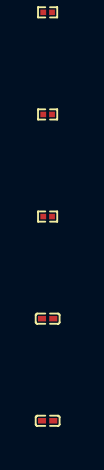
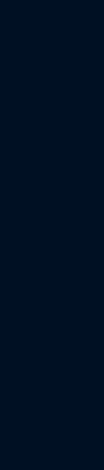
part: (47, 12) -> none
part: (47, 114) -> none
part: (47, 216) -> none
part: (47, 318) -> none
part: (47, 420) -> none

